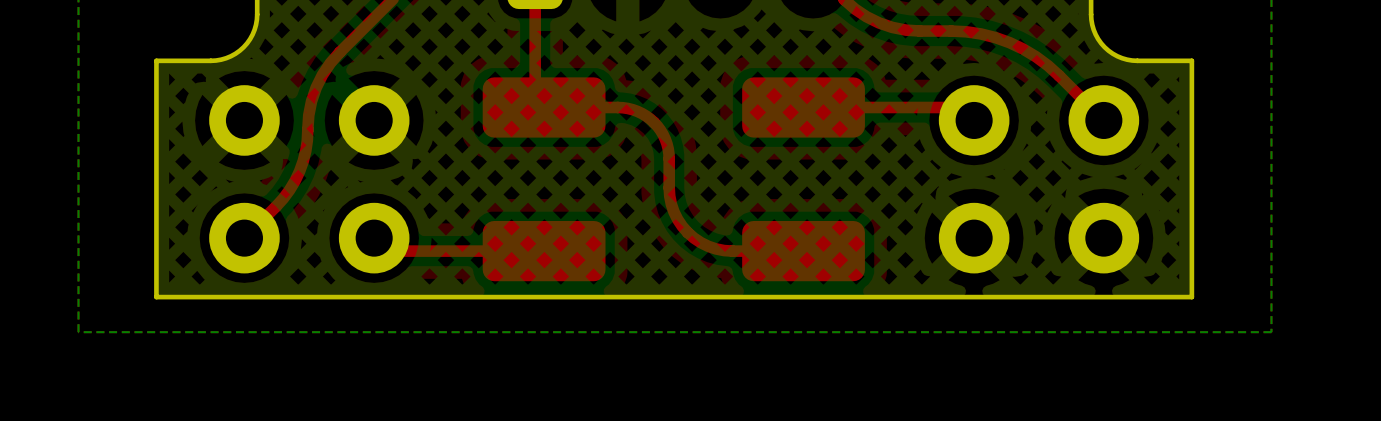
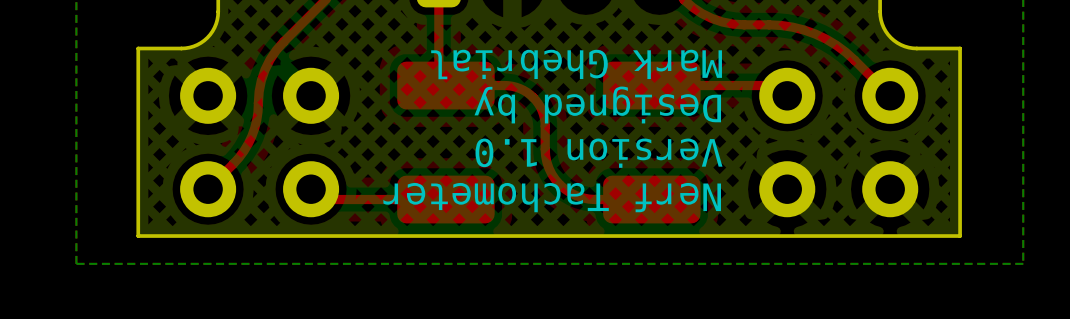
text: none -> Mark Ghebrial (576, 64)
text: none -> Designed by (597, 105)
text: none -> Version 1.0 (599, 153)
text: none -> Nerf Tachometer (552, 197)

